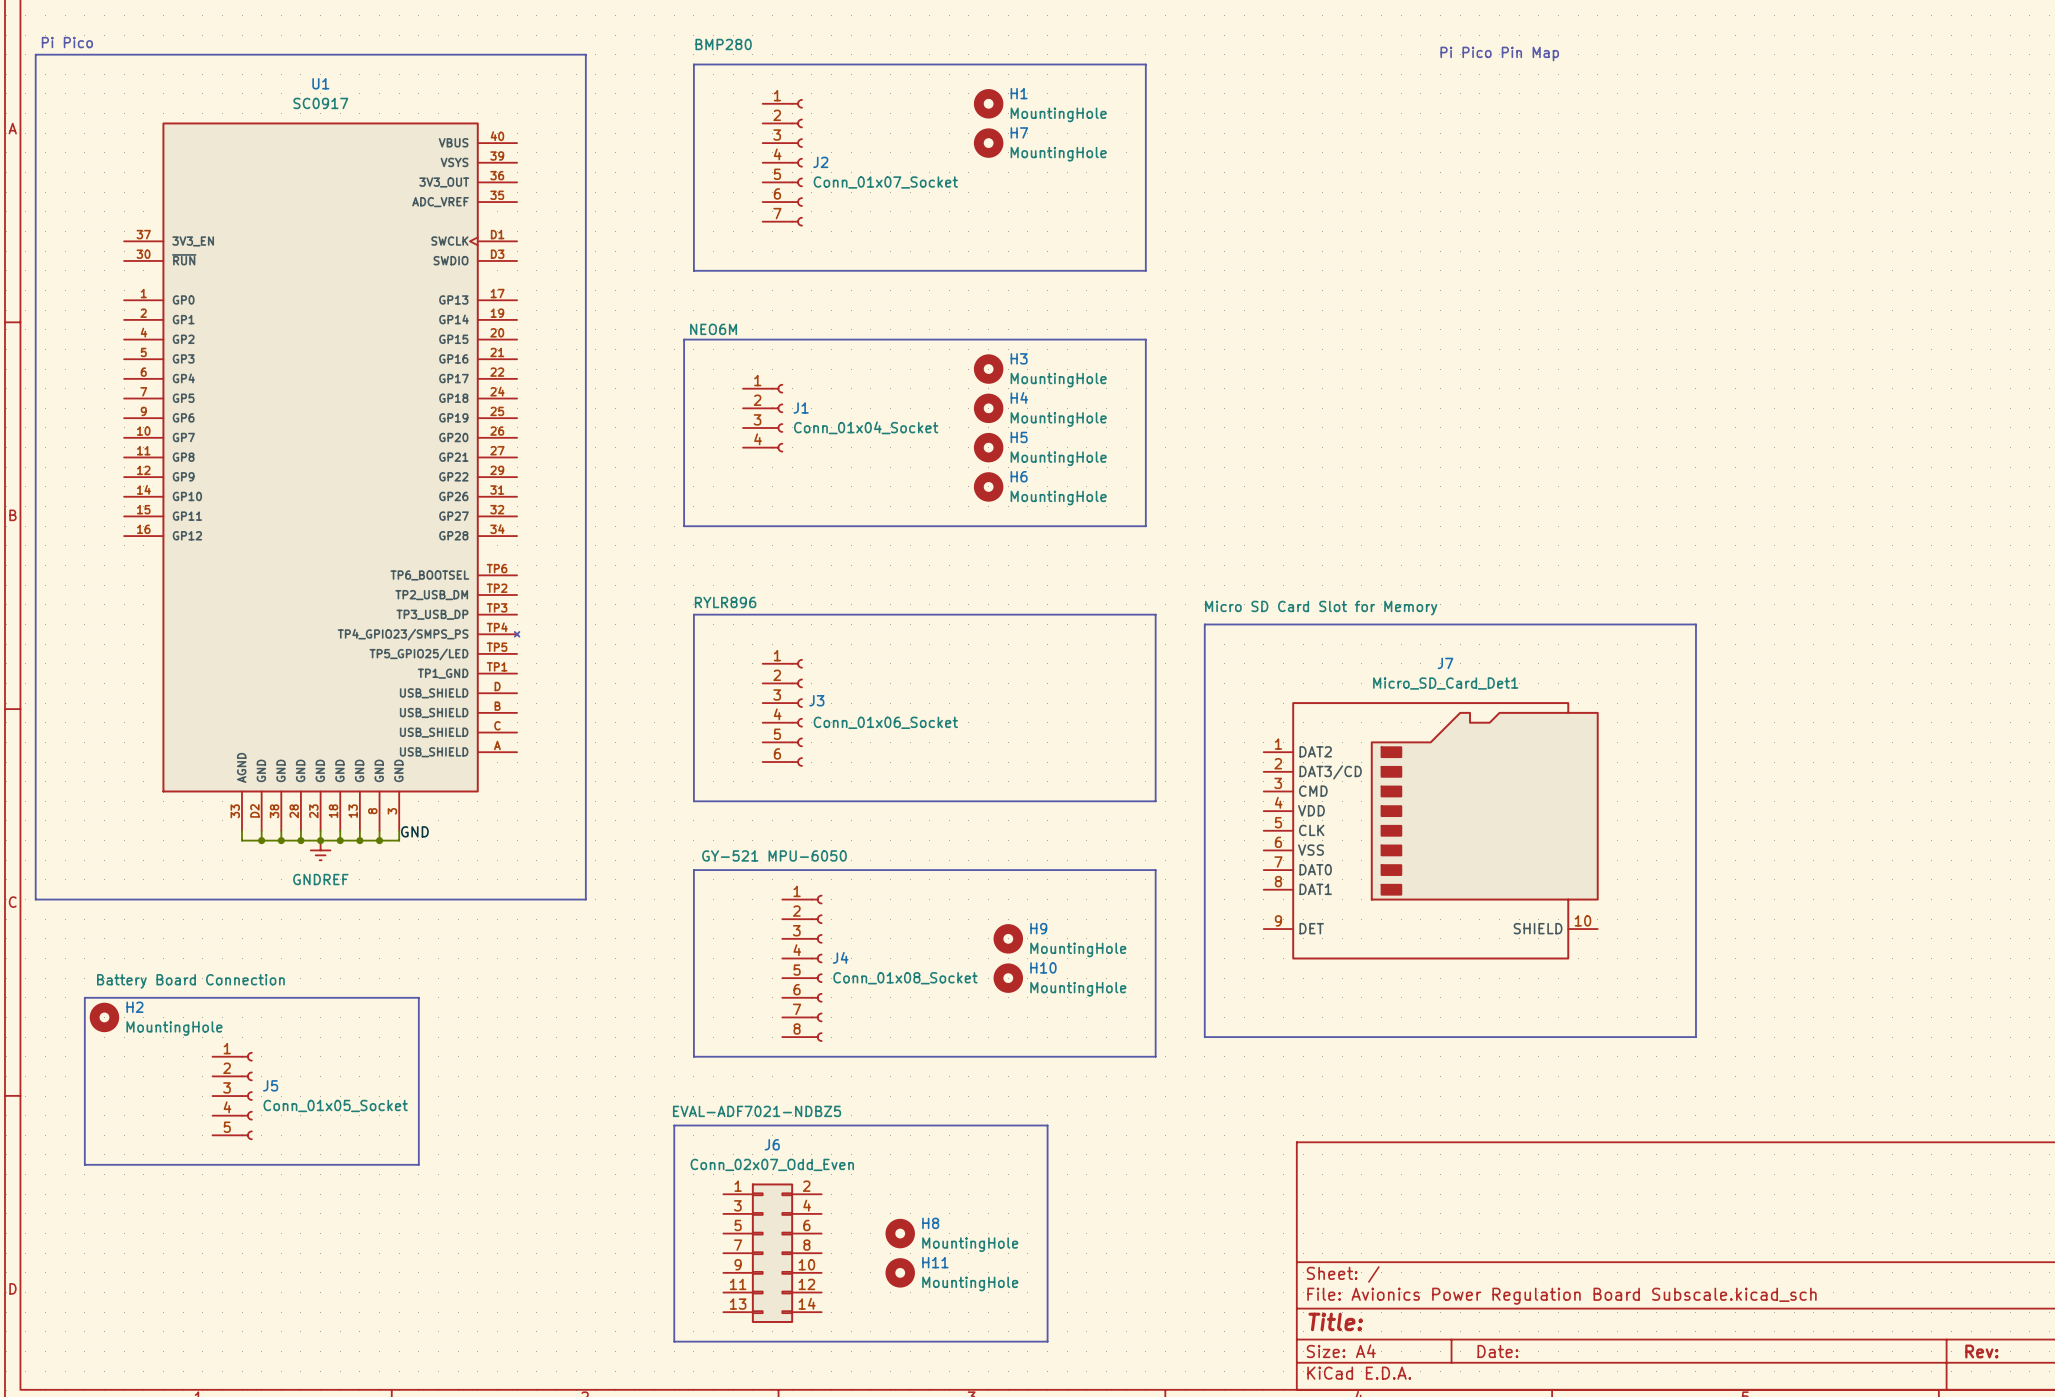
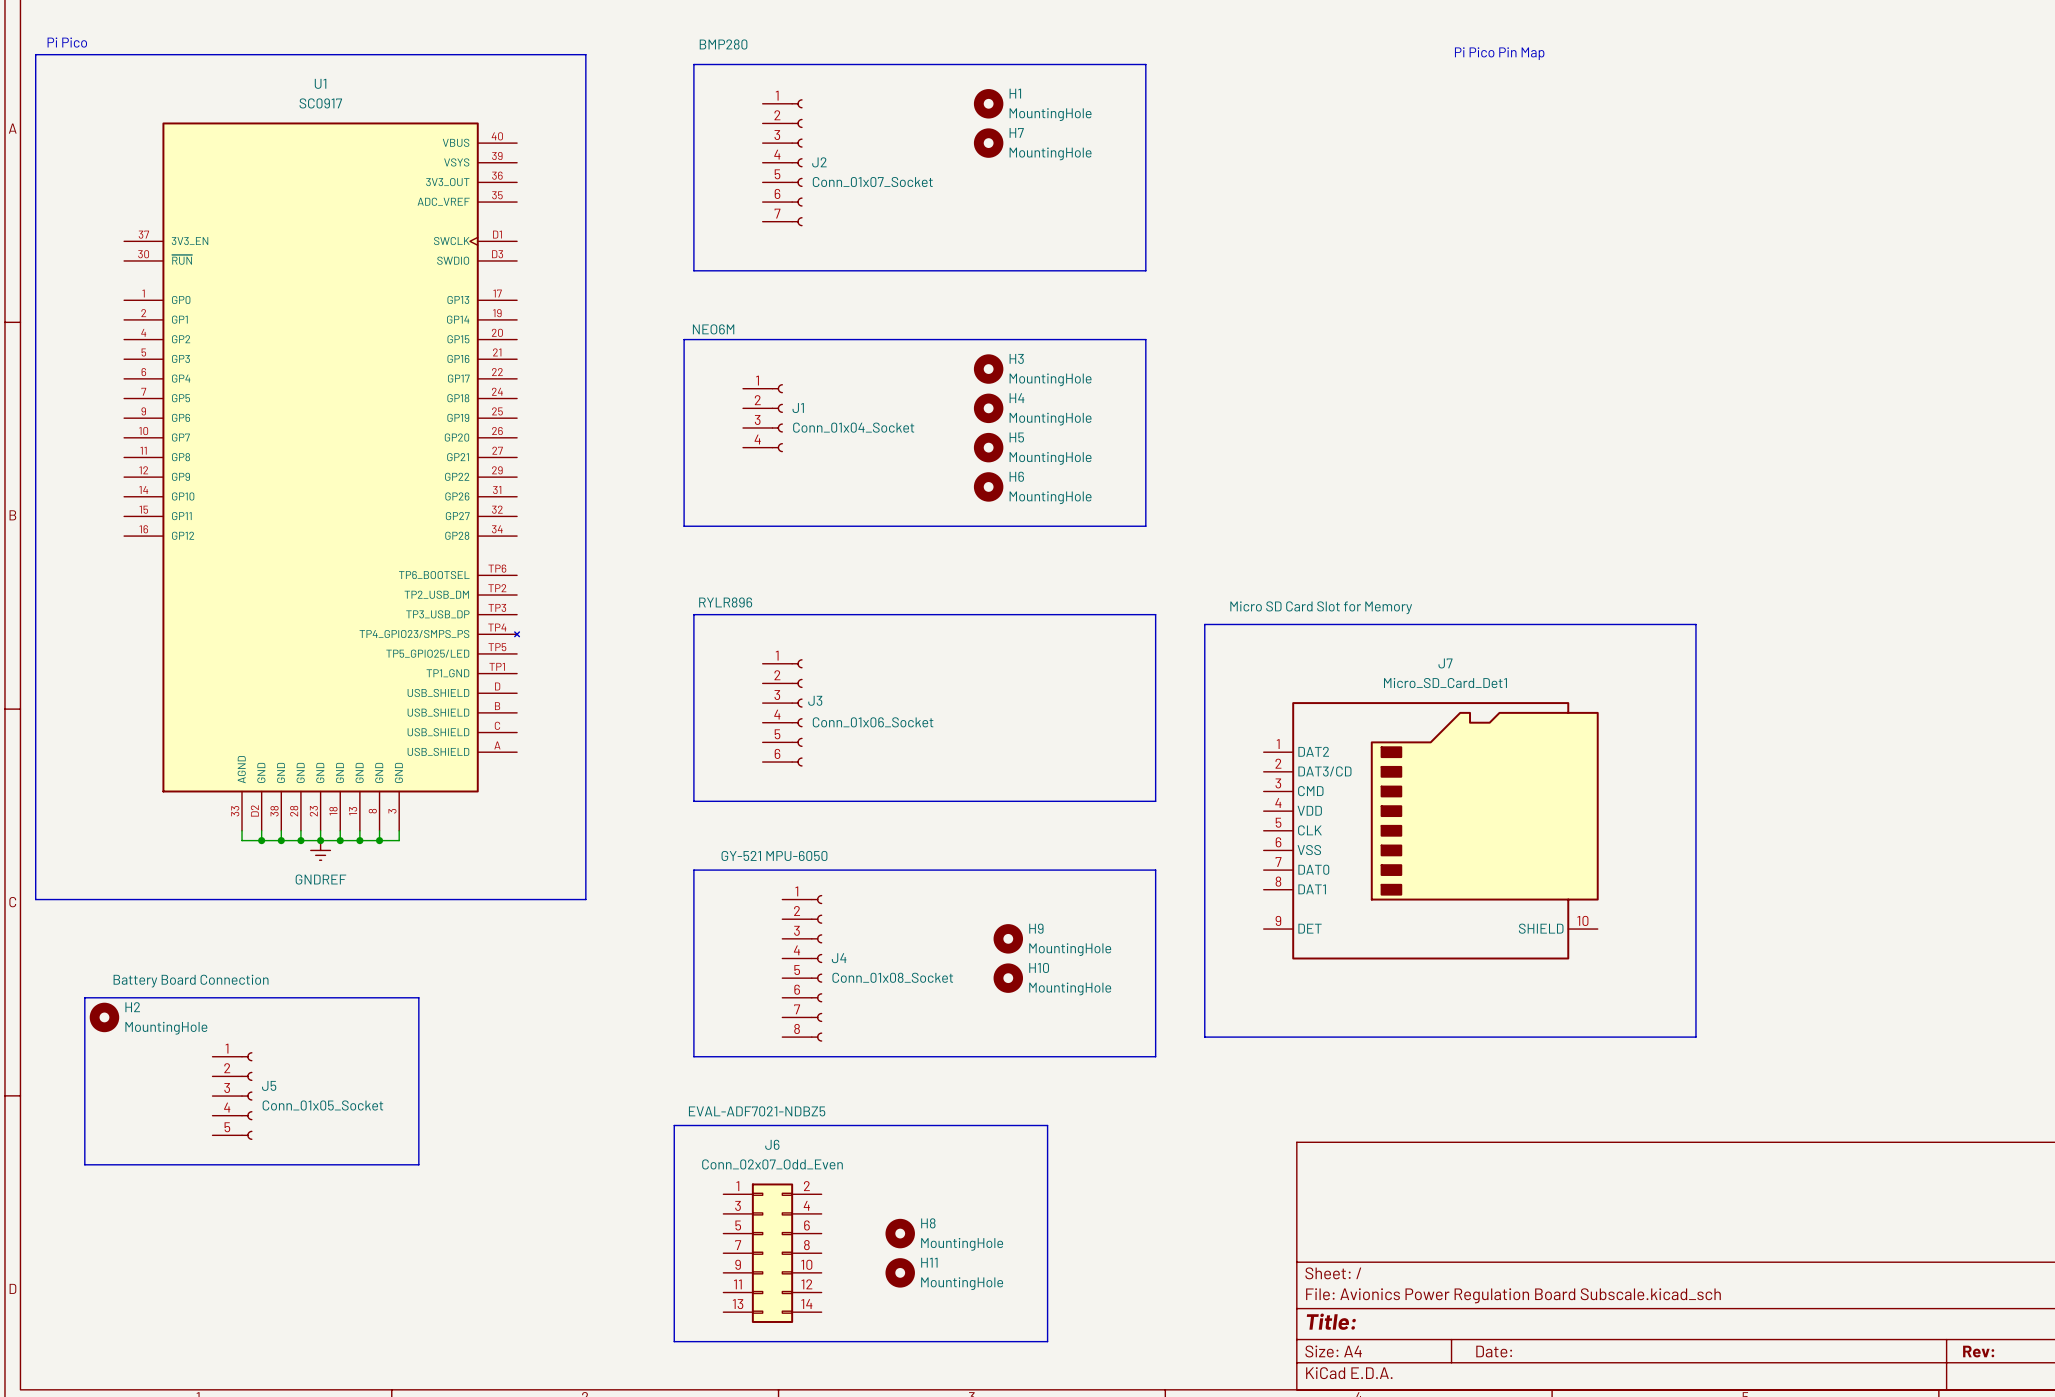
label: GND (414, 831) -> none

